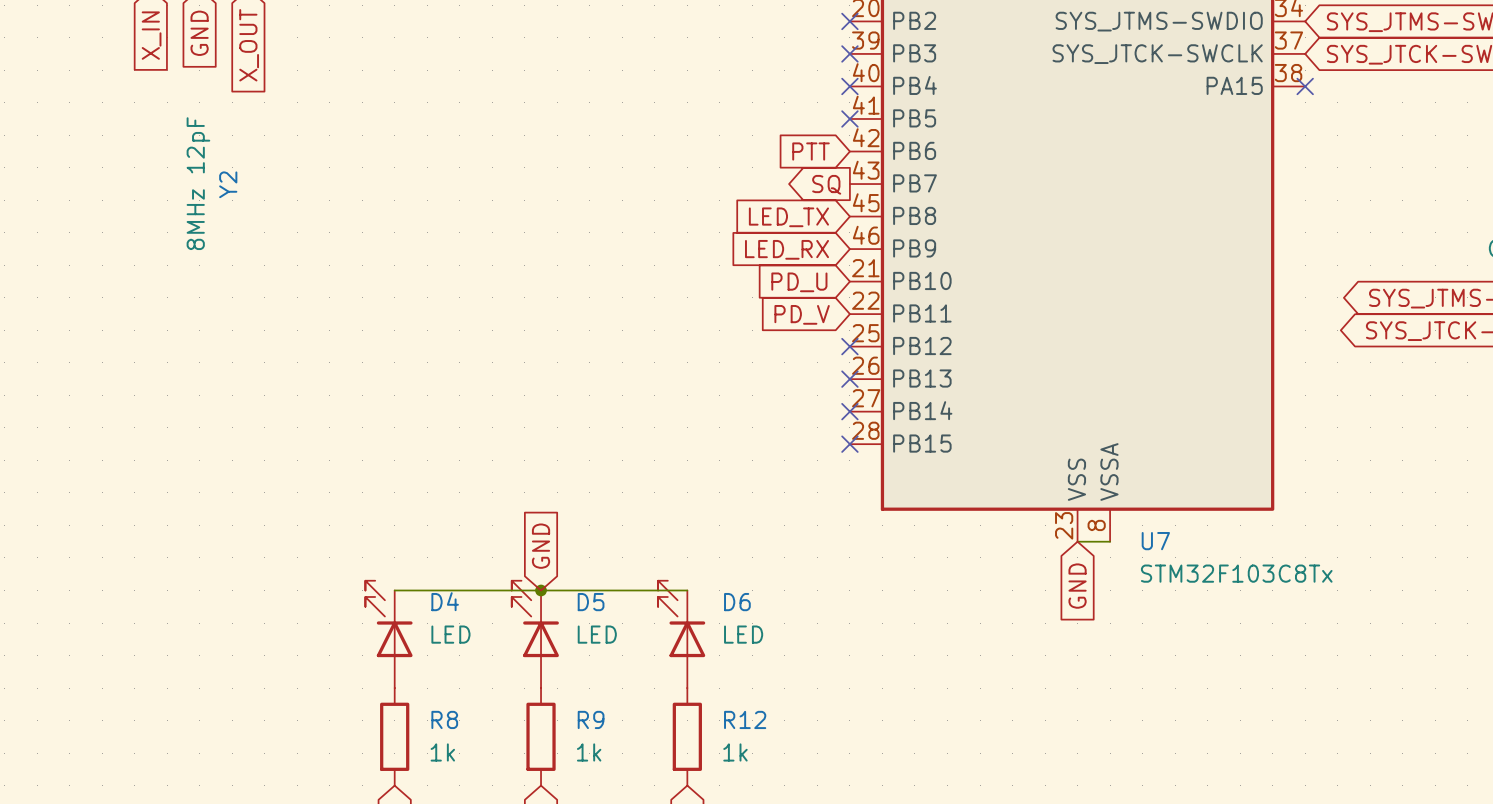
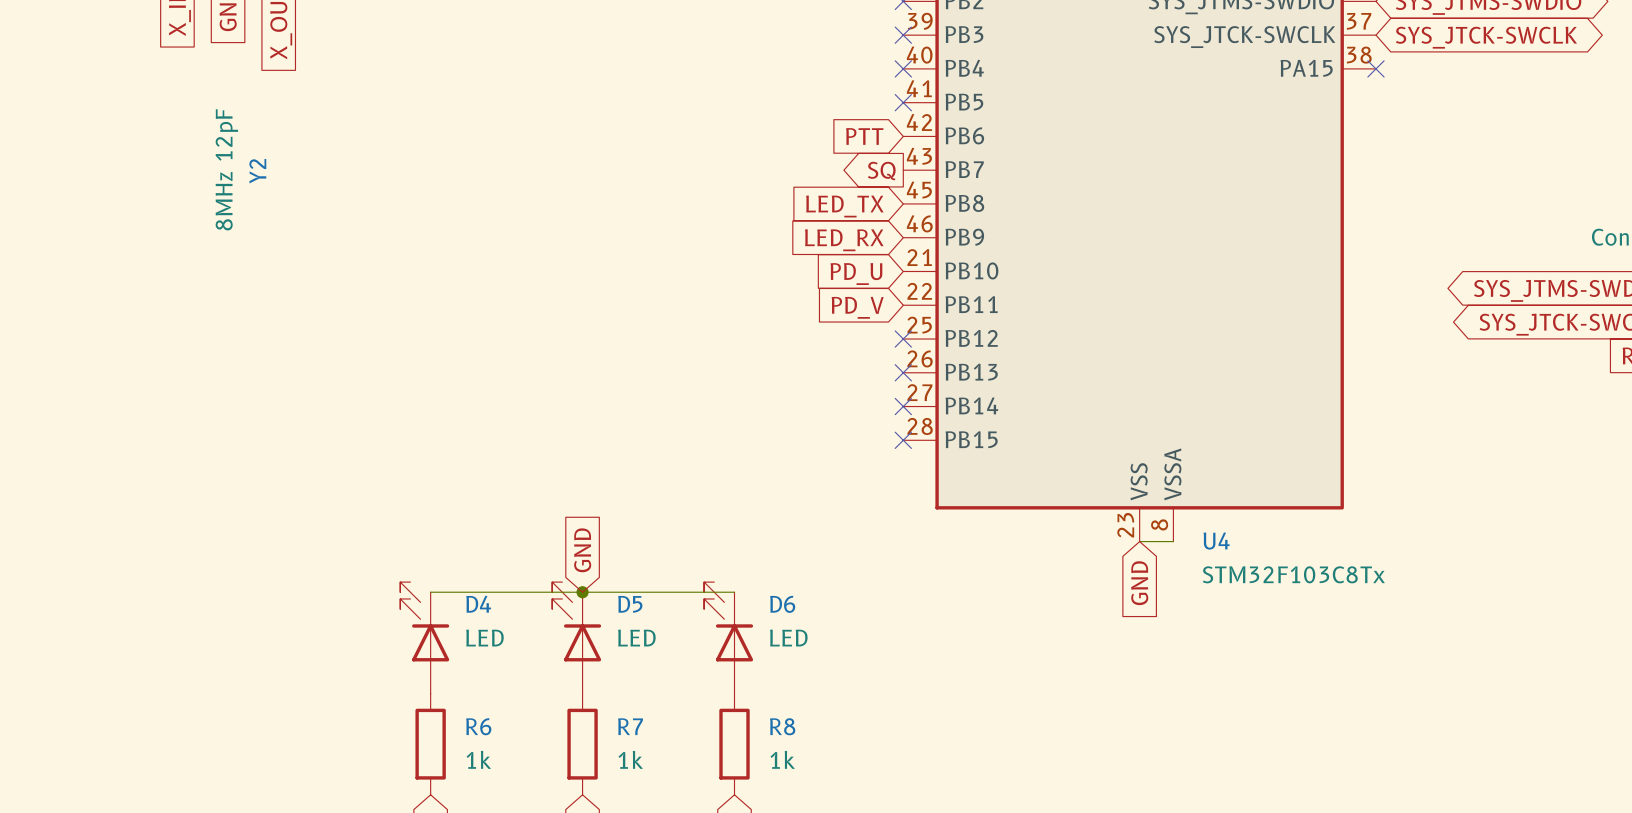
U7 name: U7 (1155, 541) -> U4 (1216, 541)
R8 name: R8 (444, 719) -> R6 (478, 726)
R9 name: R9 (591, 719) -> R7 (630, 726)
R12 name: R12 (745, 719) -> R8 (782, 726)

